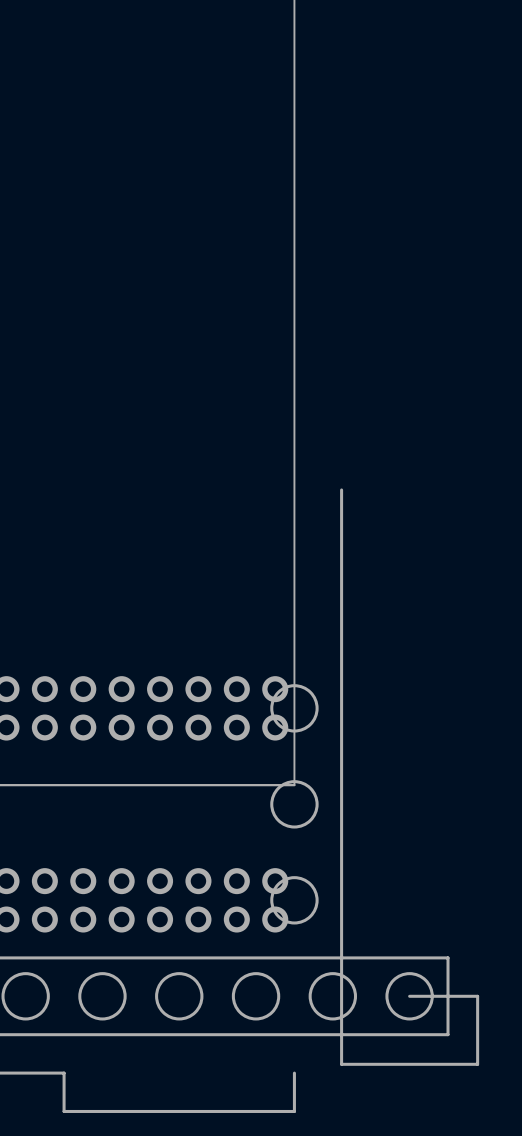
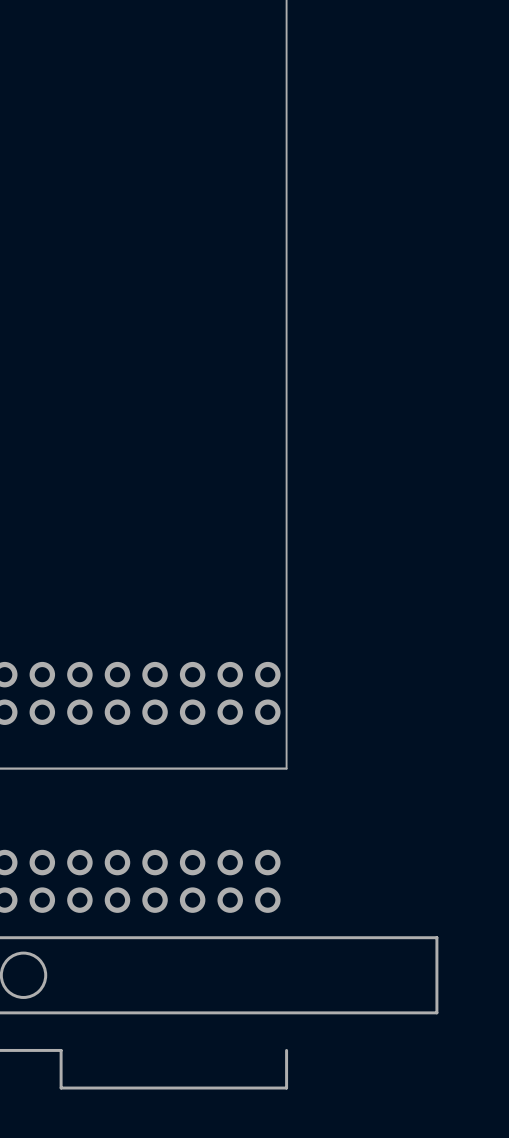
line: (341, 489) (341, 1064) (477, 1064) (477, 996) (409, 996) -> none
drawing: [270, 684, 319, 733] -> none
drawing: [270, 780, 319, 829] -> none
drawing: [270, 876, 319, 925] -> none
drawing: [78, 972, 127, 1021] -> none
drawing: [155, 972, 204, 1021] -> none
drawing: [231, 972, 281, 1021] -> none
drawing: [308, 972, 358, 1021] -> none
drawing: [385, 972, 434, 1021] -> none

